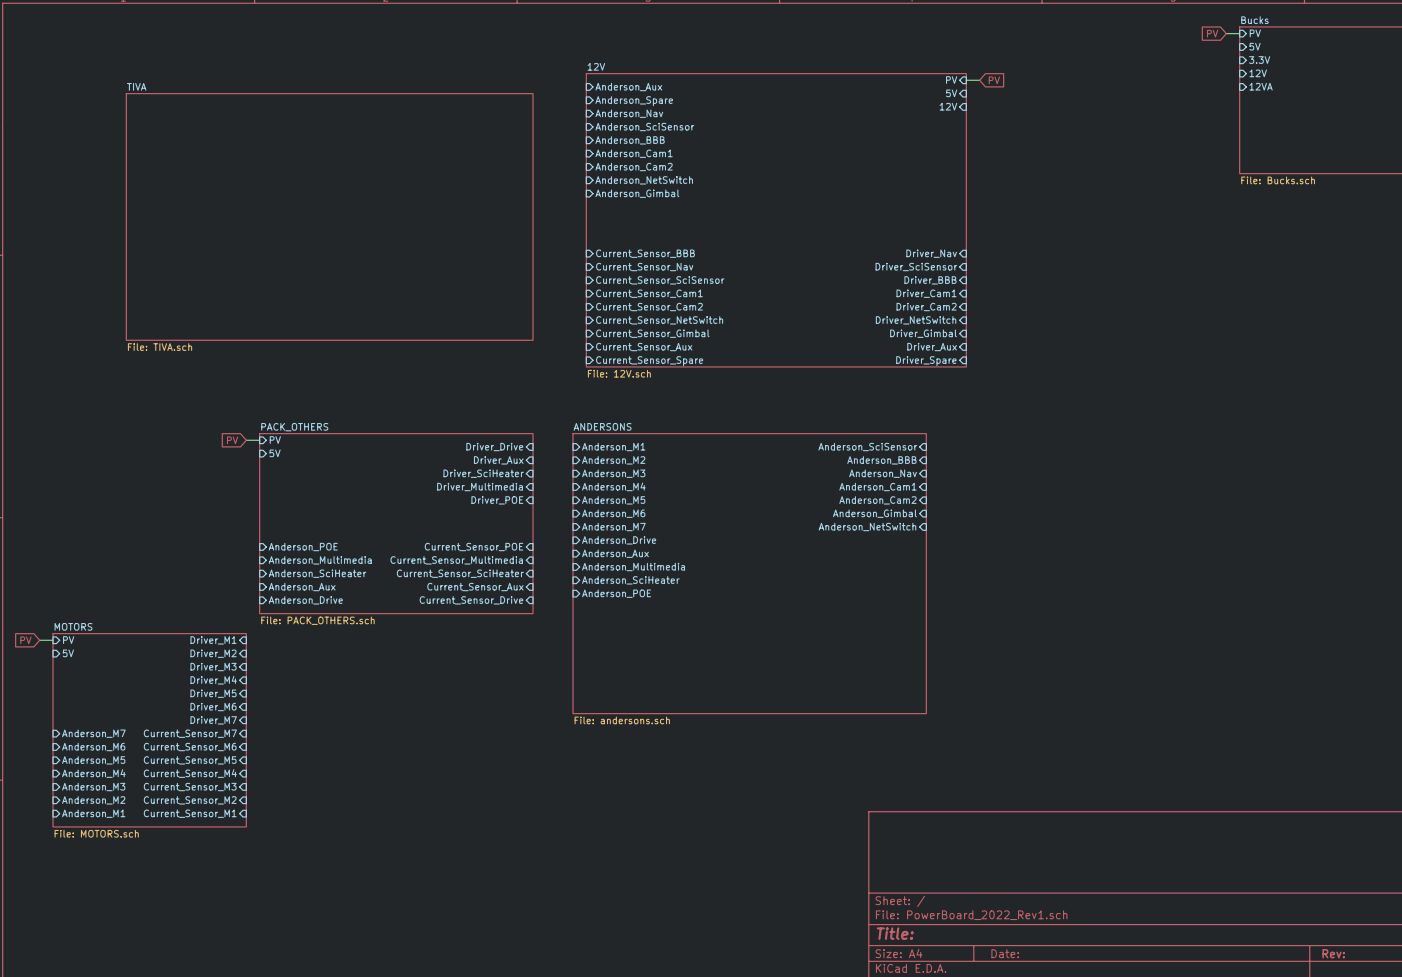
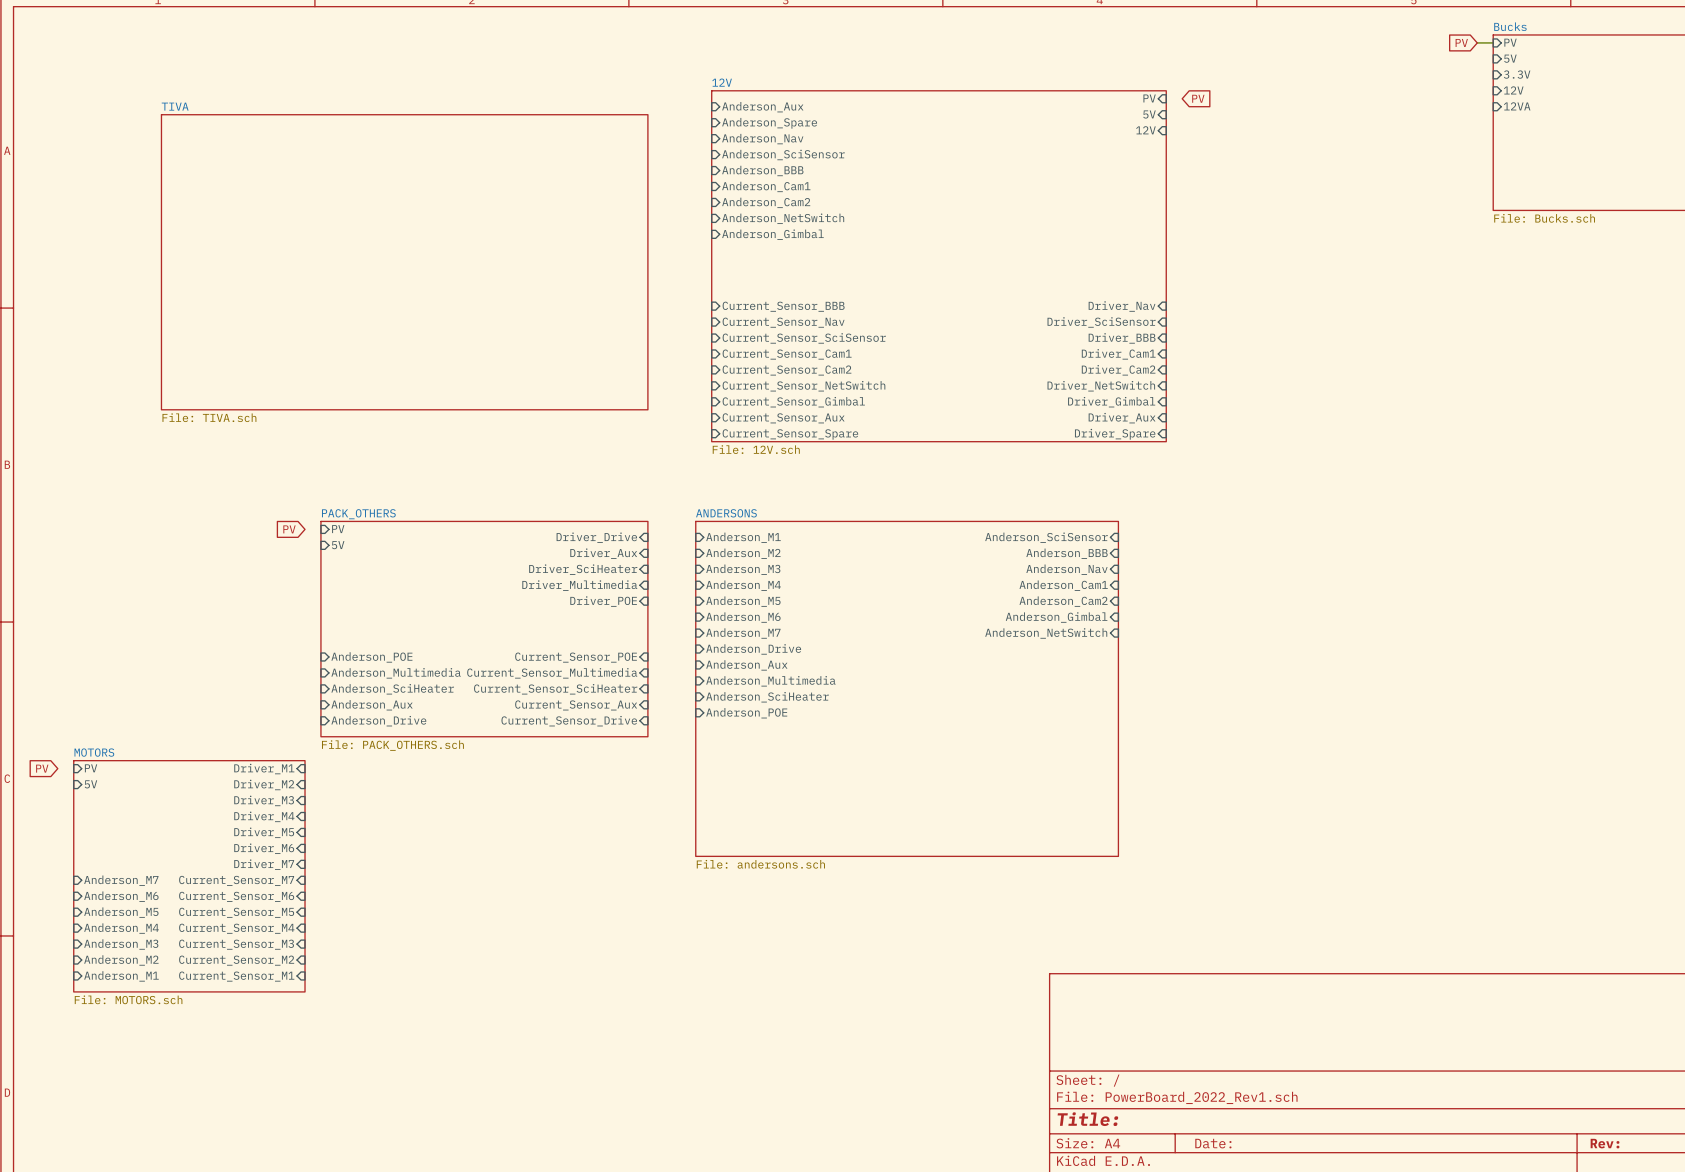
wire: (966, 80) (979, 80) -> none
wire: (246, 440) (259, 440) -> none
wire: (39, 640) (52, 640) -> none

